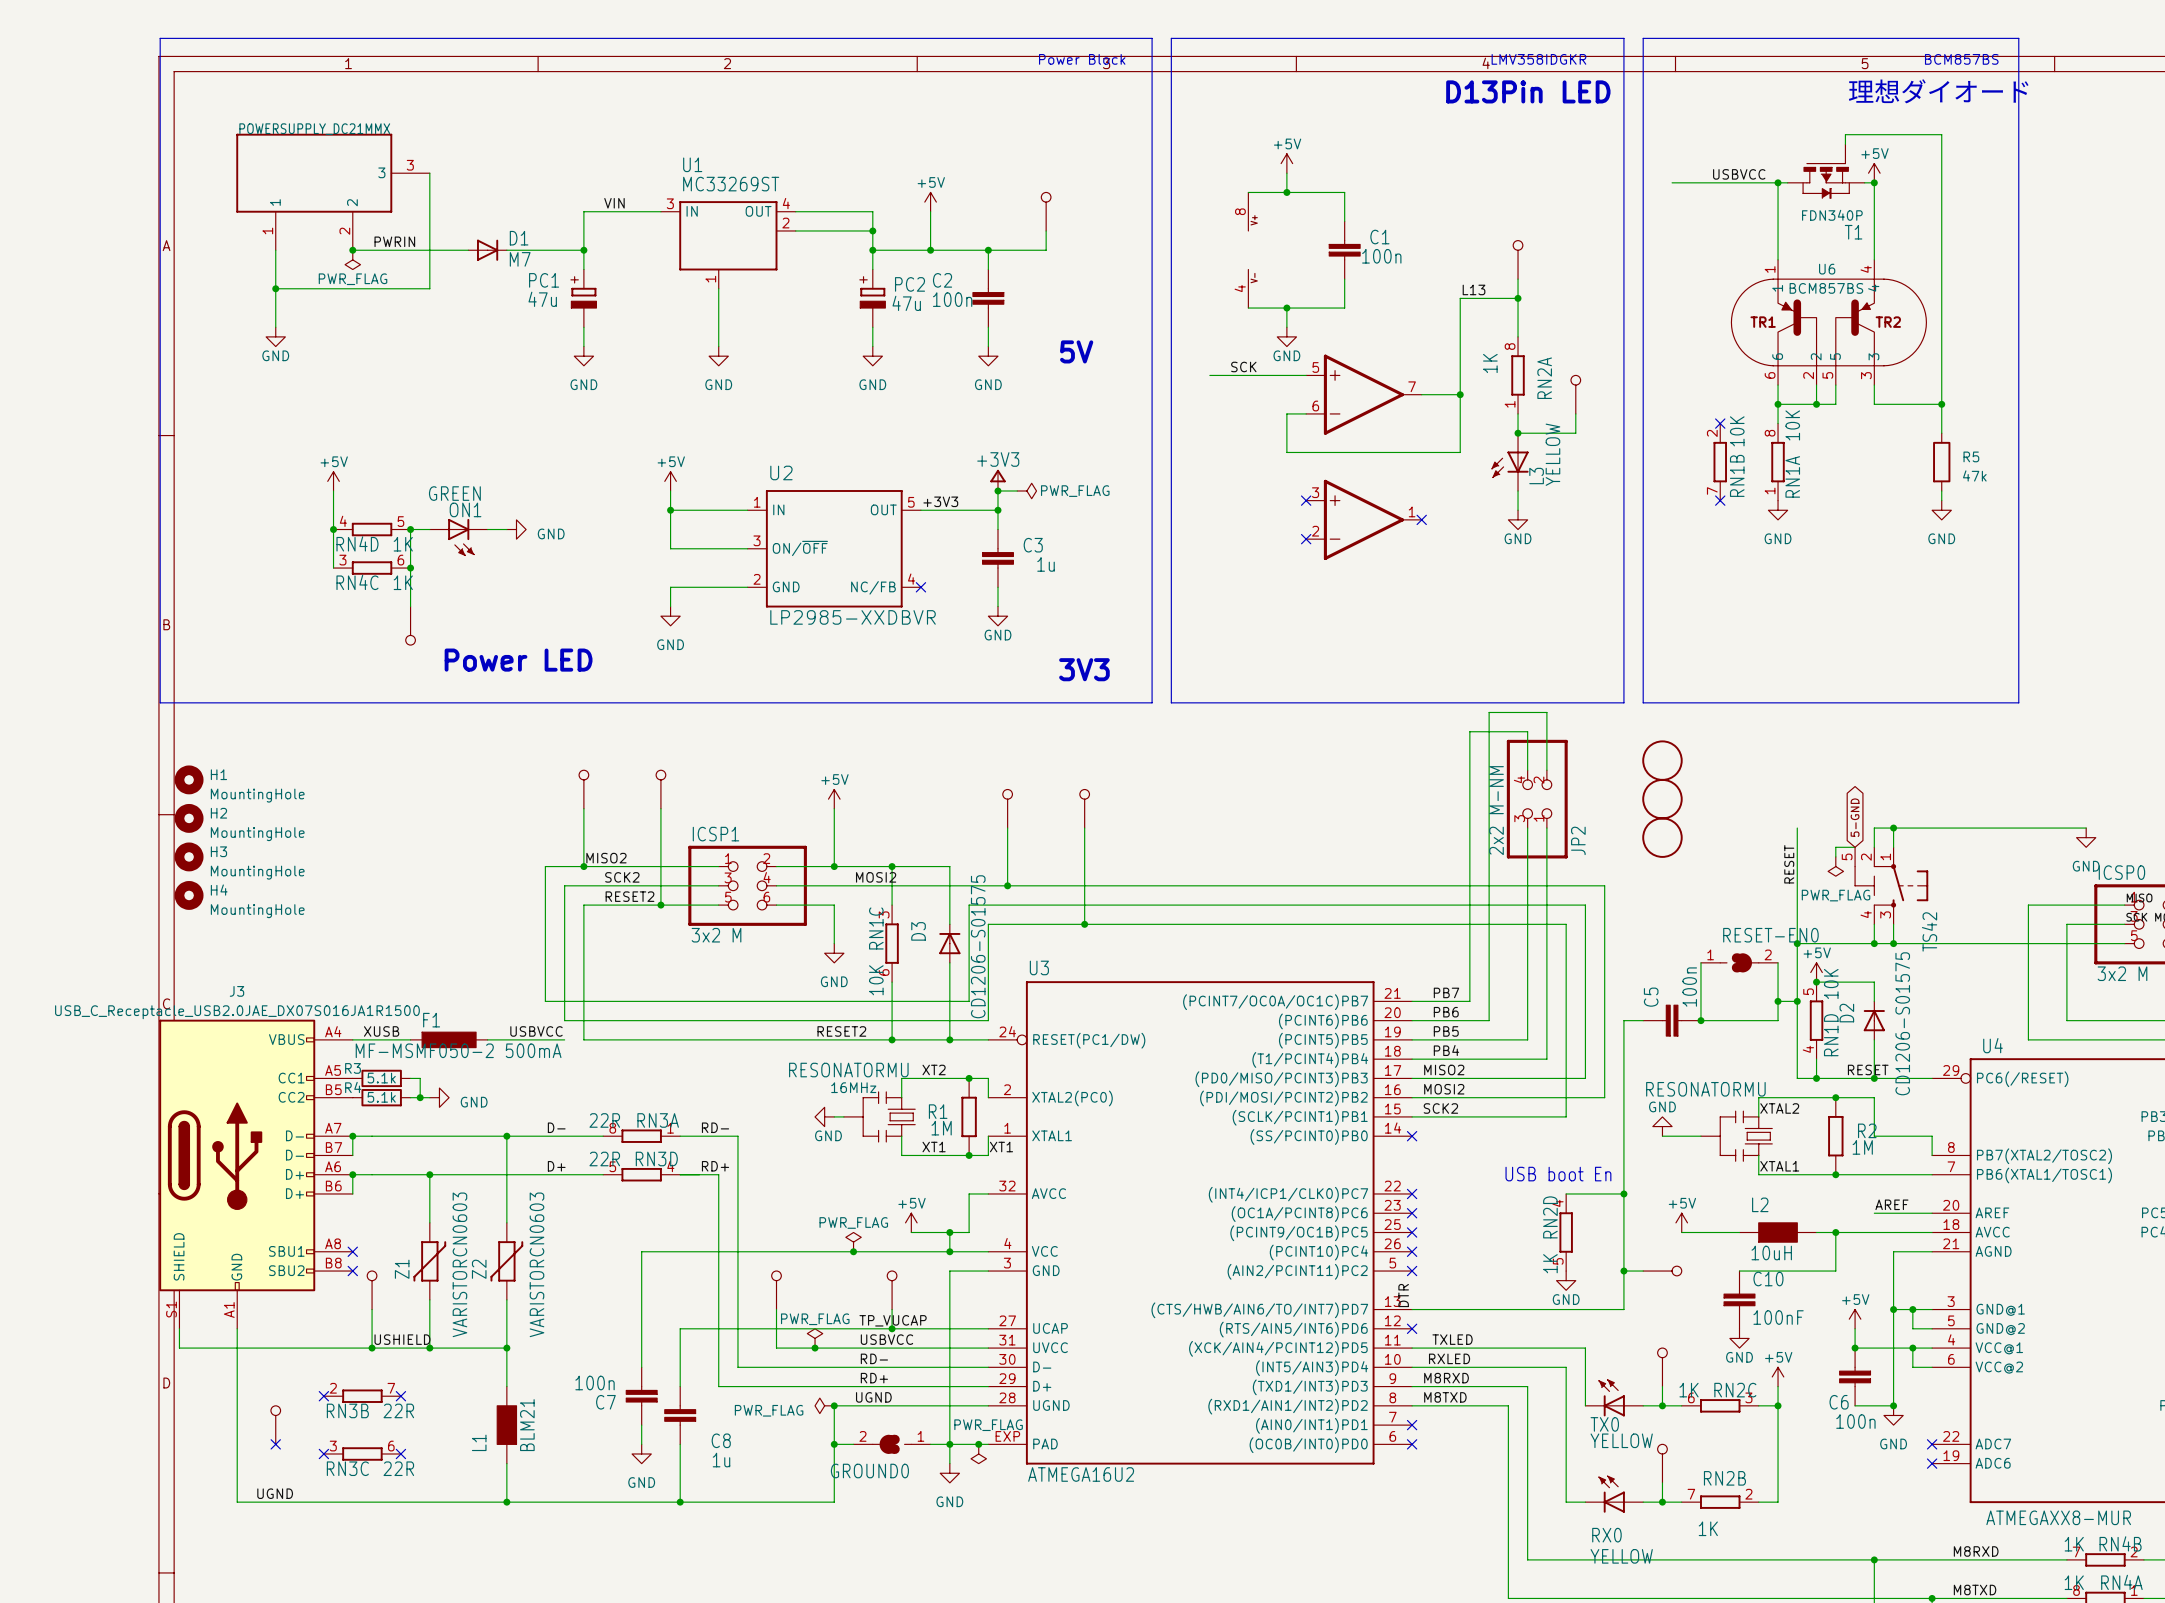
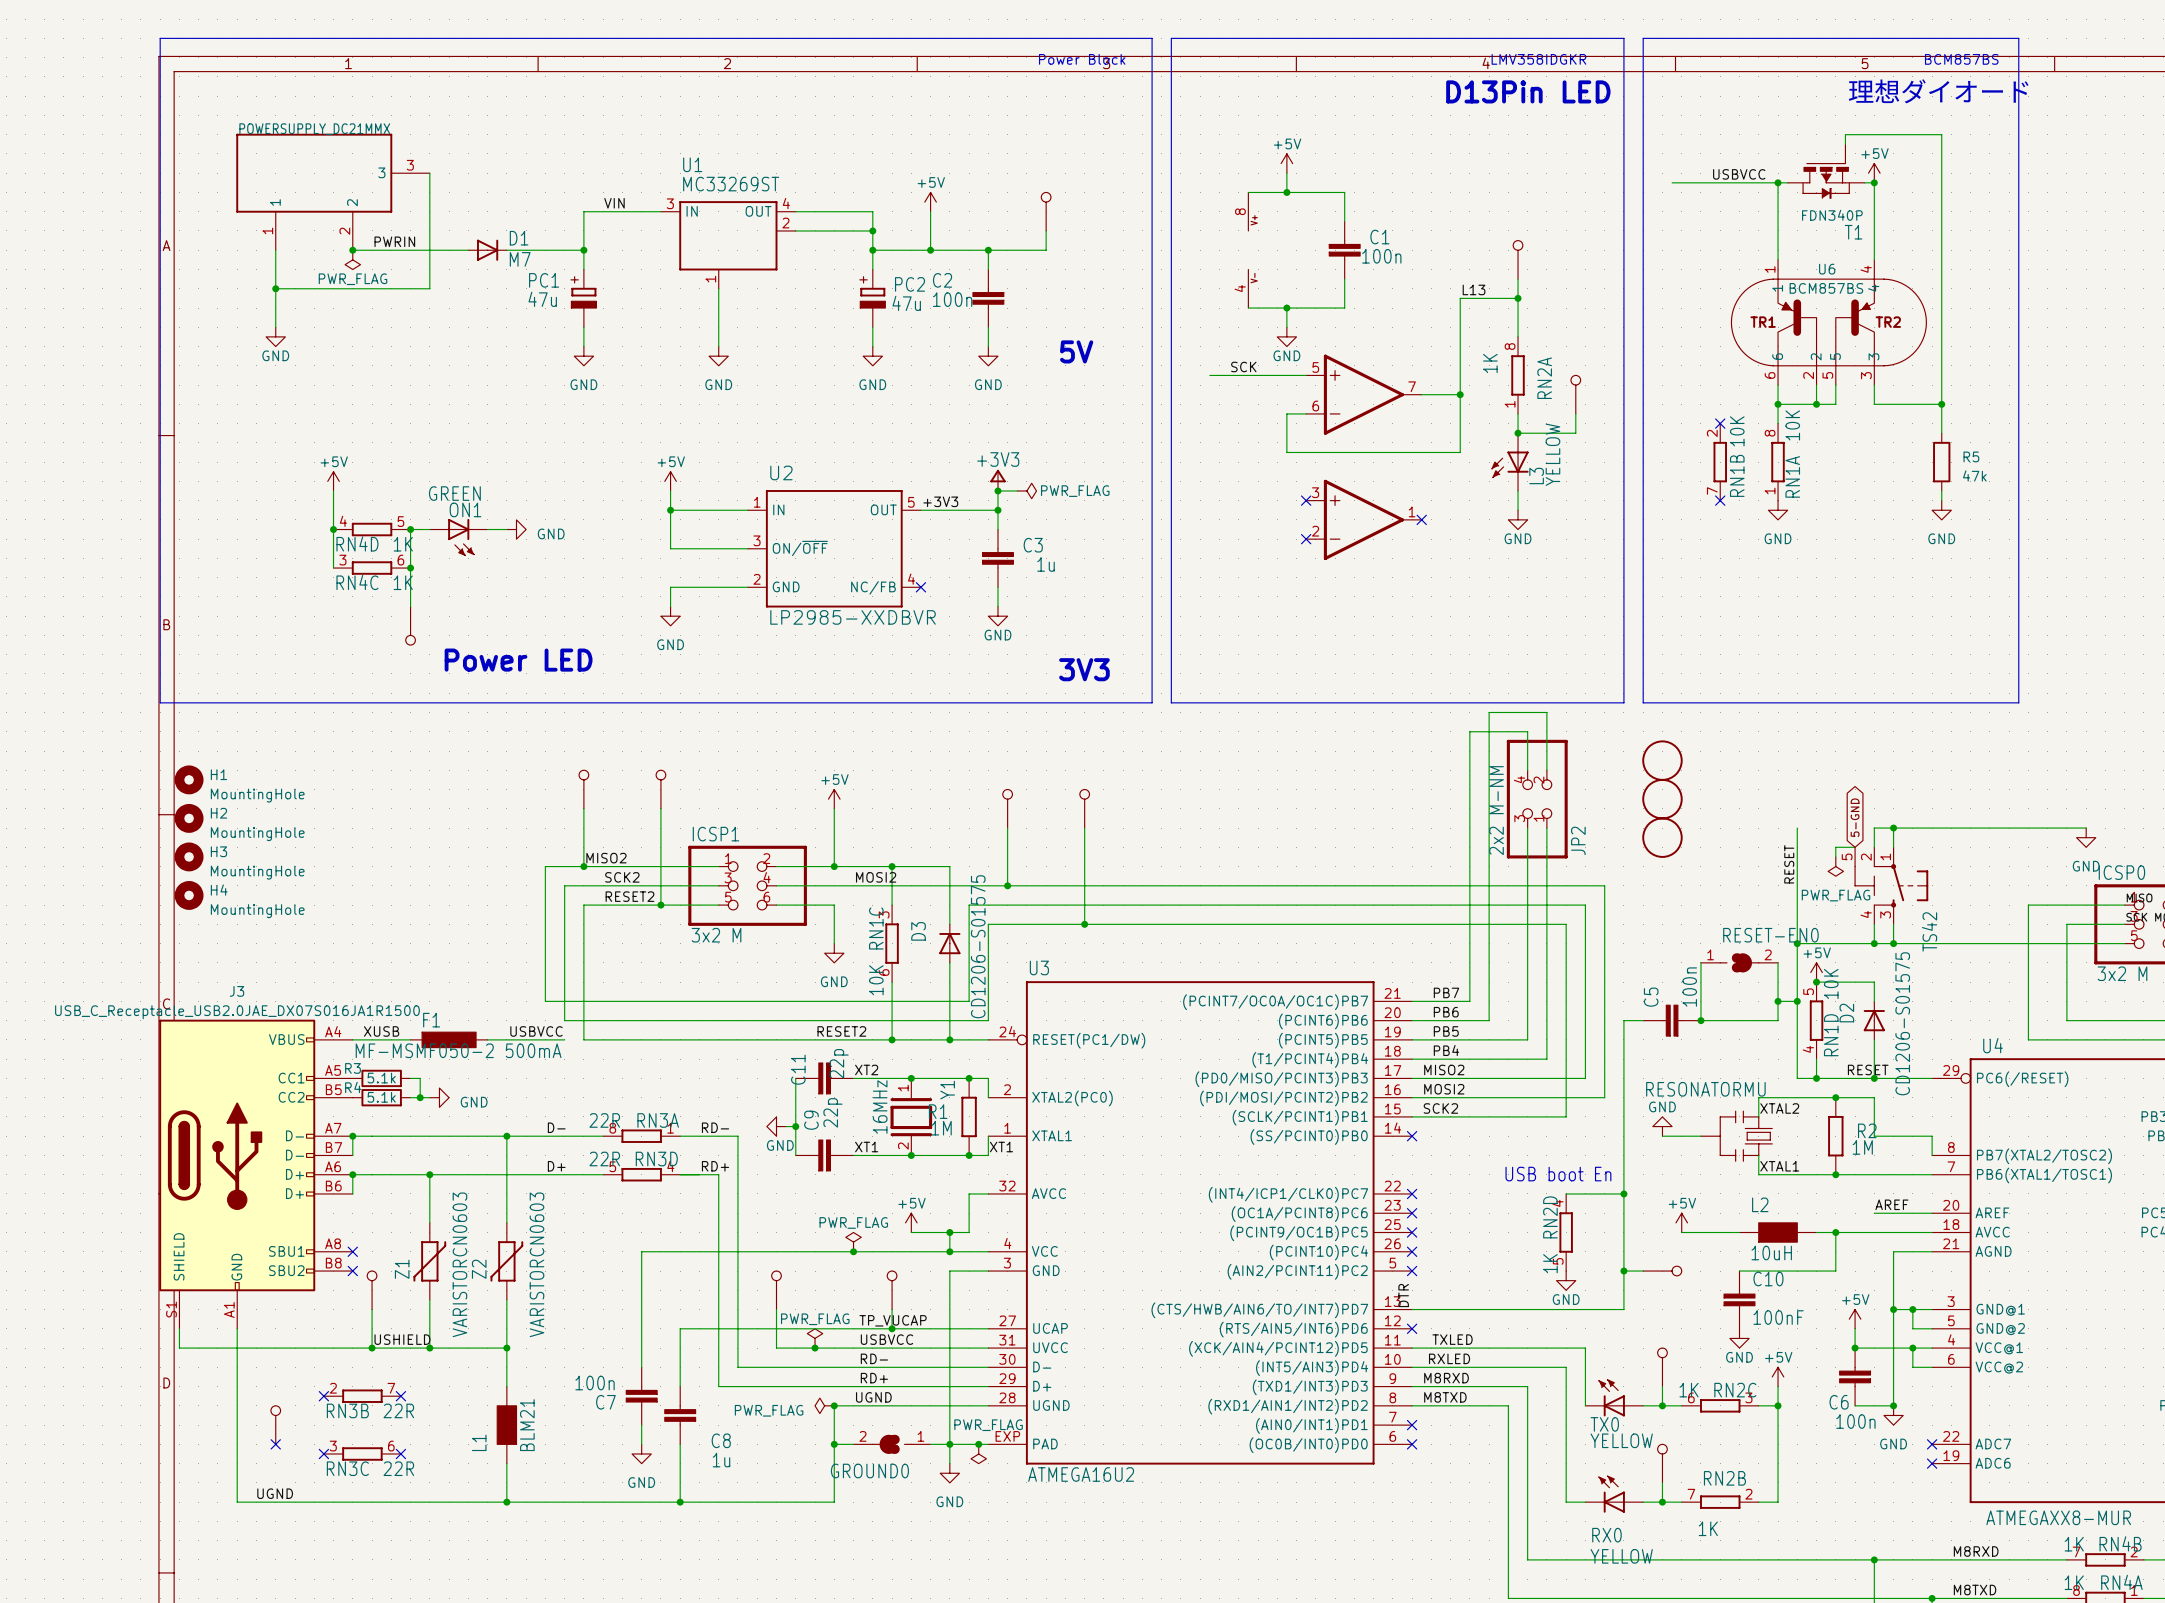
label position: XT2 (934, 1069) -> XT2 (866, 1069)
wire: none -> (795, 1078) (795, 1155)
C11: none -> 22p (824, 1078)
wire: (901, 1078) (901, 1097) -> (901, 1078) (853, 1078)
junction: none -> (911, 1078)
power symbol position: GND (824, 1116) -> GND (776, 1126)
wire: (834, 1116) (843, 1116) -> (786, 1126) (795, 1126)
part: RESONATORMU (879, 1116) -> none
Y1: none -> 16MHz (911, 1116)
junction: none -> (795, 1126)
wire: (901, 1136) (901, 1155) -> (853, 1155) (901, 1155)
label position: XT1 (934, 1147) -> XT1 (866, 1147)
C9: none -> 22p (824, 1155)
junction: none -> (911, 1155)

